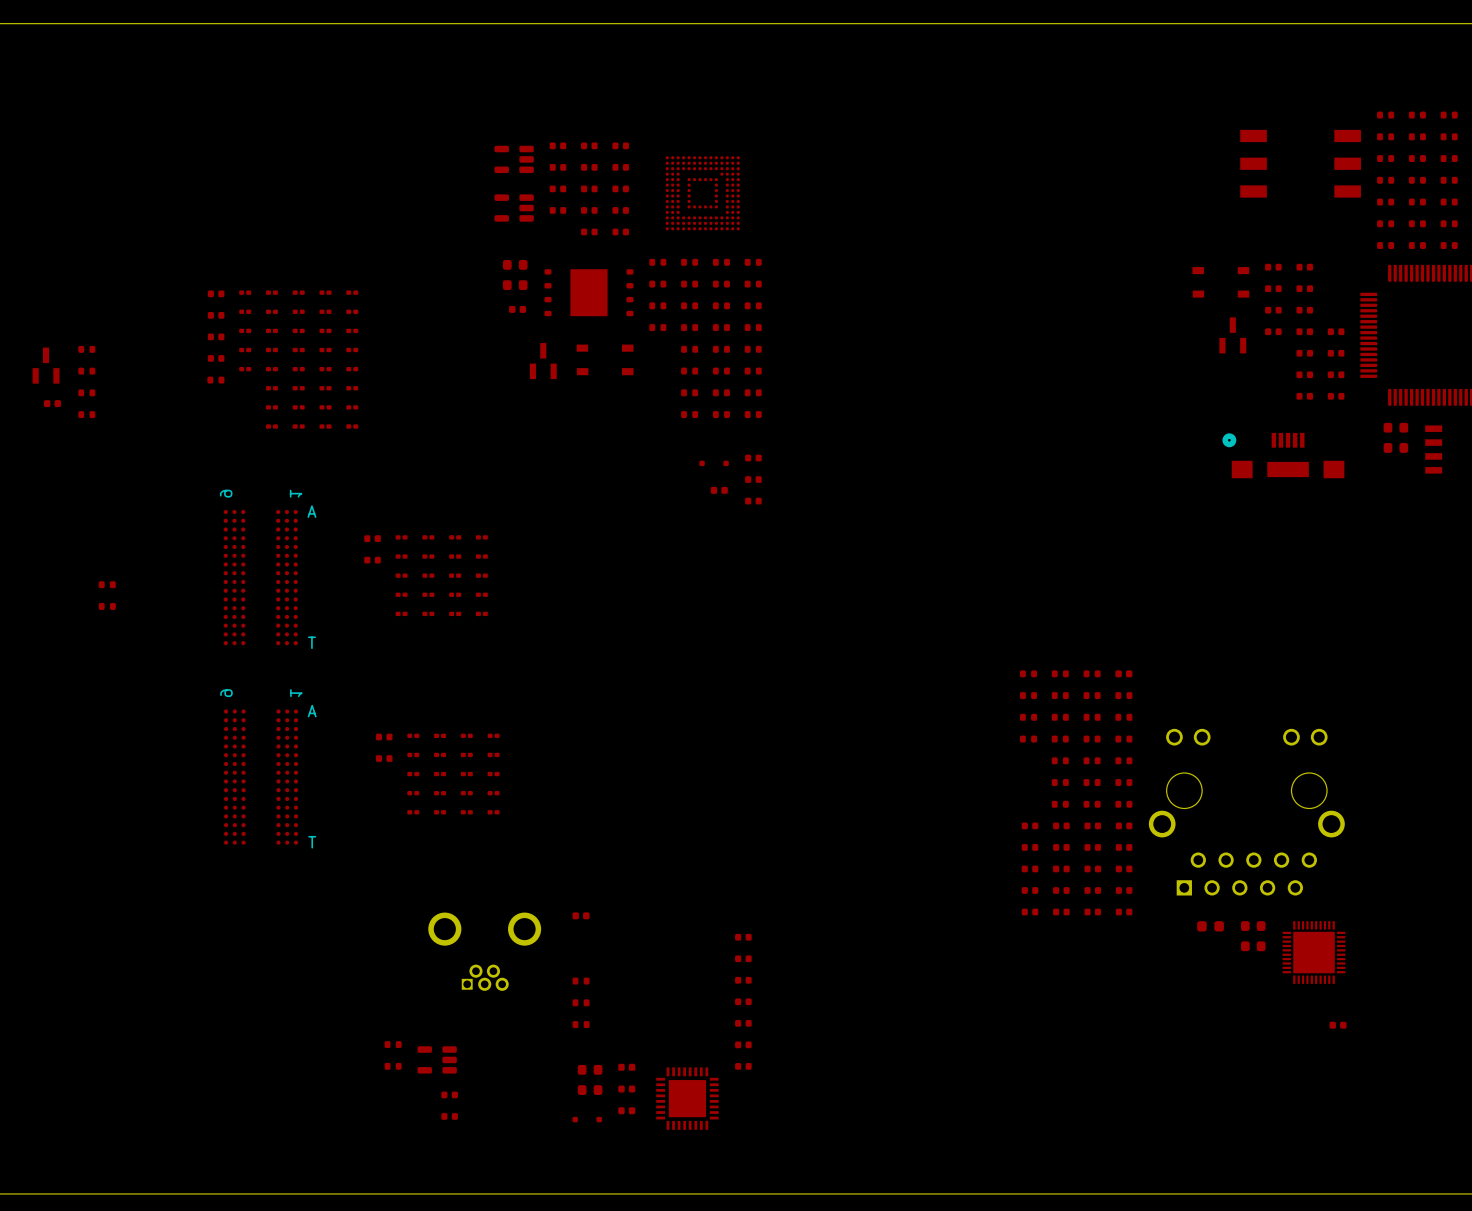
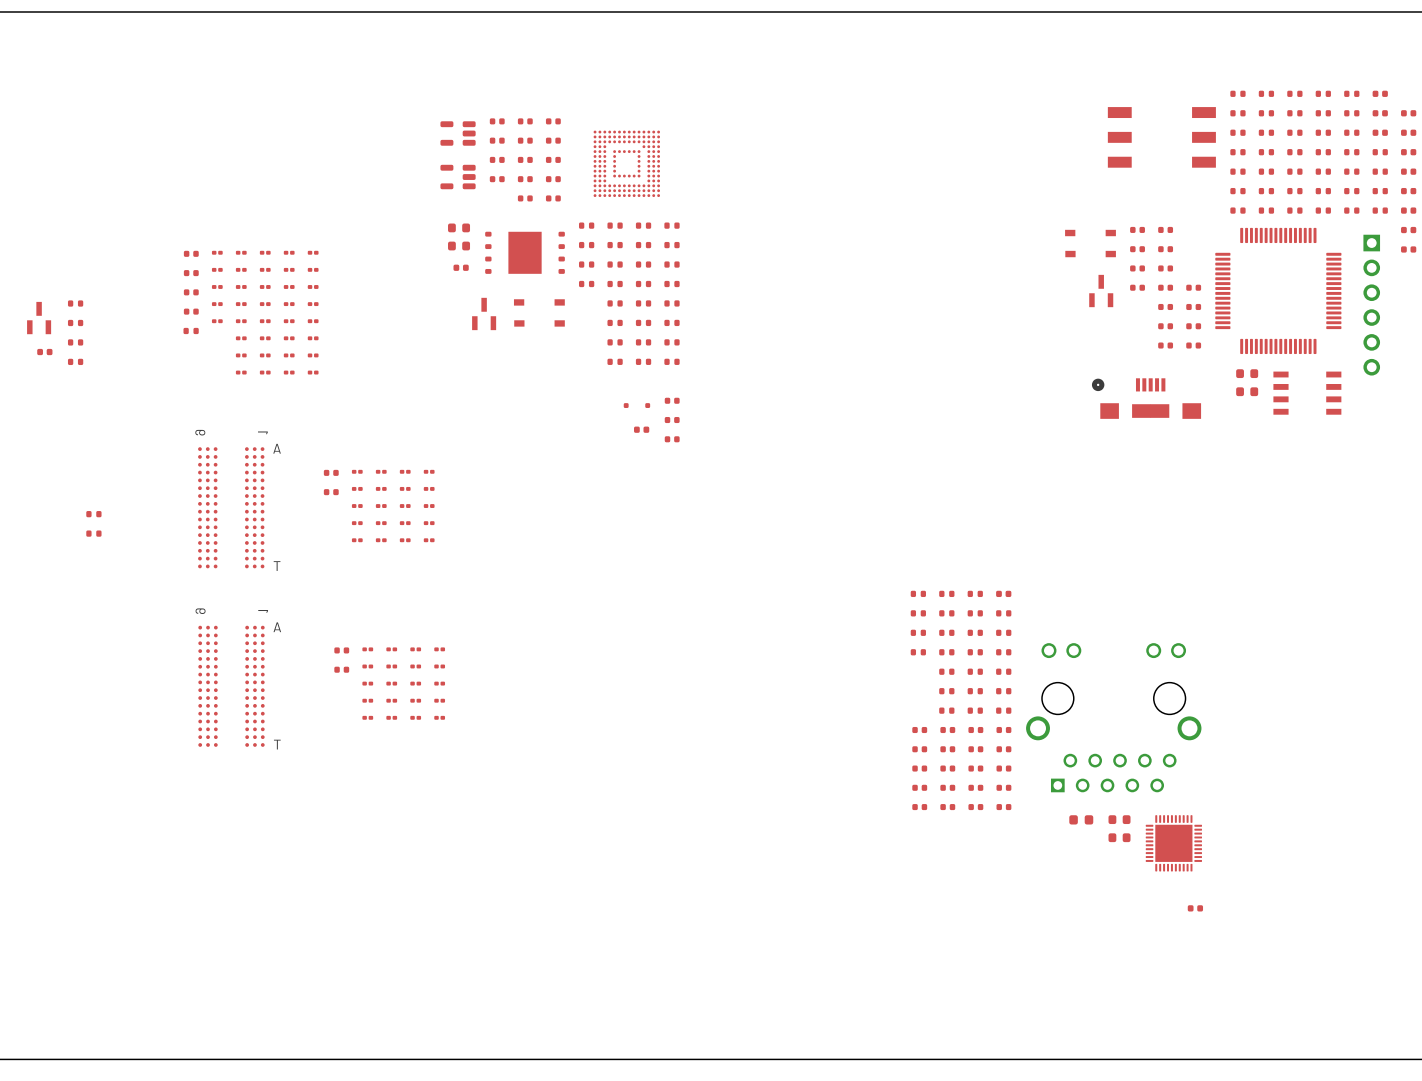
part: (581, 915) -> none
part: (743, 937) -> none
part: (484, 951) -> none
part: (743, 958) -> none
part: (743, 980) -> none
part: (581, 981) -> none
part: (743, 1001) -> none
part: (581, 1002) -> none
part: (743, 1023) -> none
part: (581, 1024) -> none
part: (393, 1044) -> none
part: (743, 1044) -> none
part: (437, 1059) -> none
part: (393, 1066) -> none
part: (743, 1066) -> none
part: (626, 1067) -> none
part: (590, 1079) -> none
part: (626, 1089) -> none
part: (449, 1094) -> none
part: (687, 1098) -> none
part: (626, 1110) -> none
part: (449, 1116) -> none
part: (587, 1119) -> none

